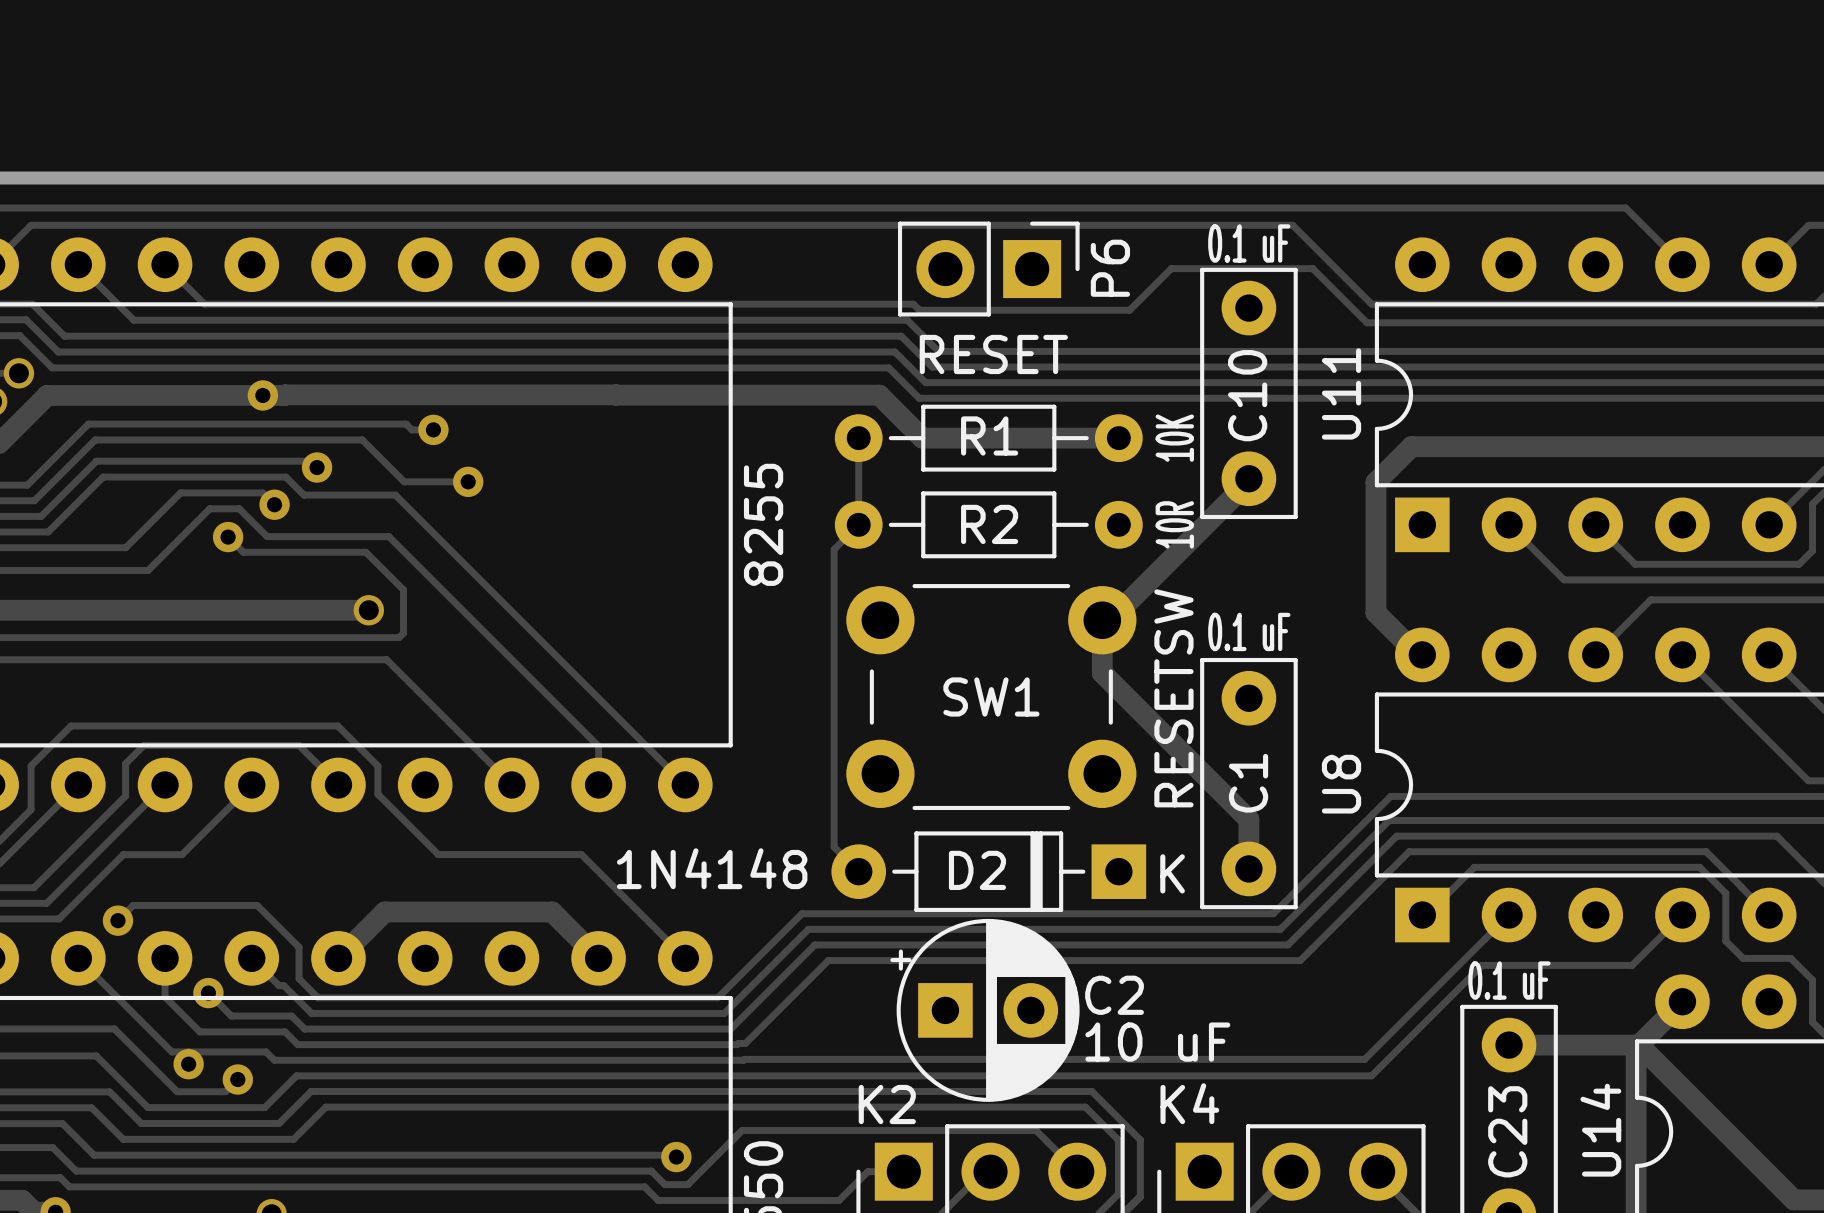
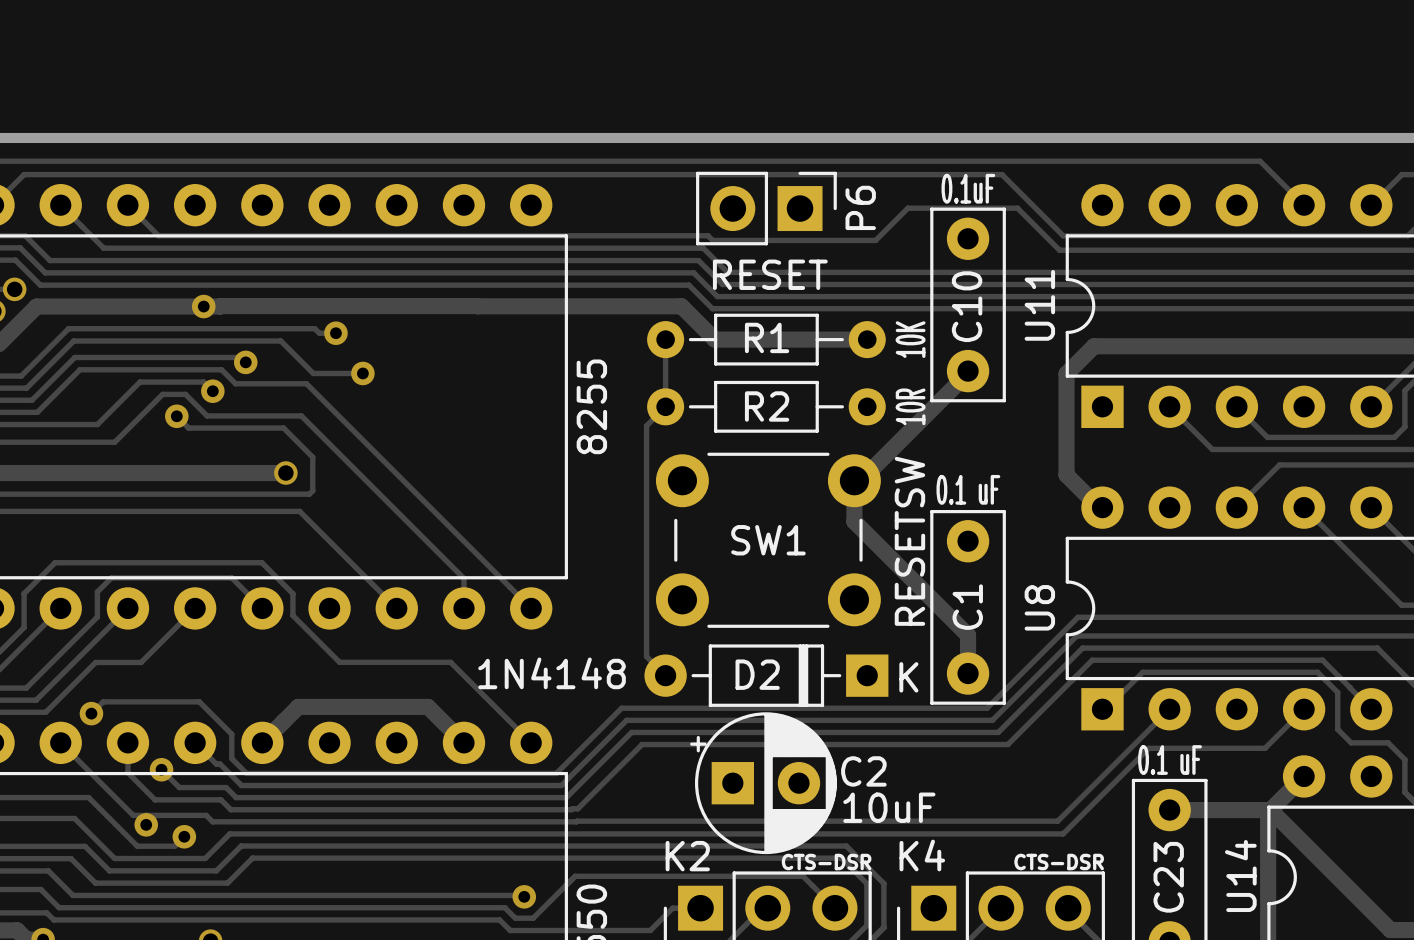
C10 value: 0.1 uF (1249, 243) -> 0.1uF (968, 188)
C2 value: 10 uF (1157, 1042) -> 10uF (889, 807)
K2 value: none -> CTS-DSR (826, 862)
K4 value: none -> CTS-DSR (1059, 862)

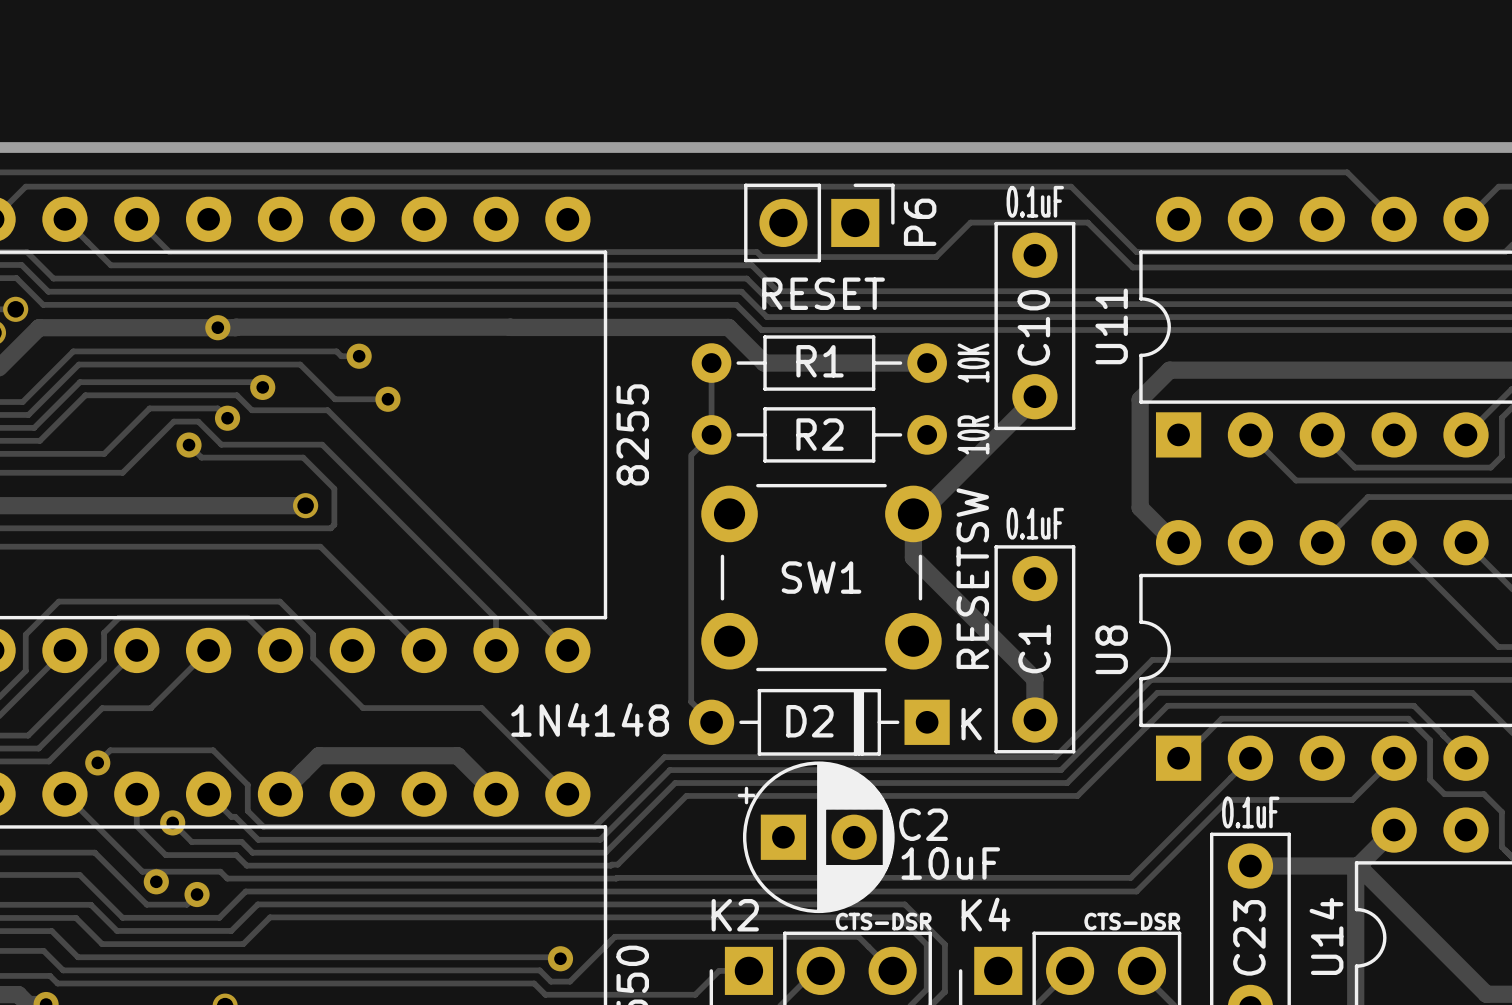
C1 value: 0.1 uF (968, 489) -> 0.1uF (1035, 523)
C23 value: 0.1 uF (1170, 760) -> 0.1uF (1250, 812)

